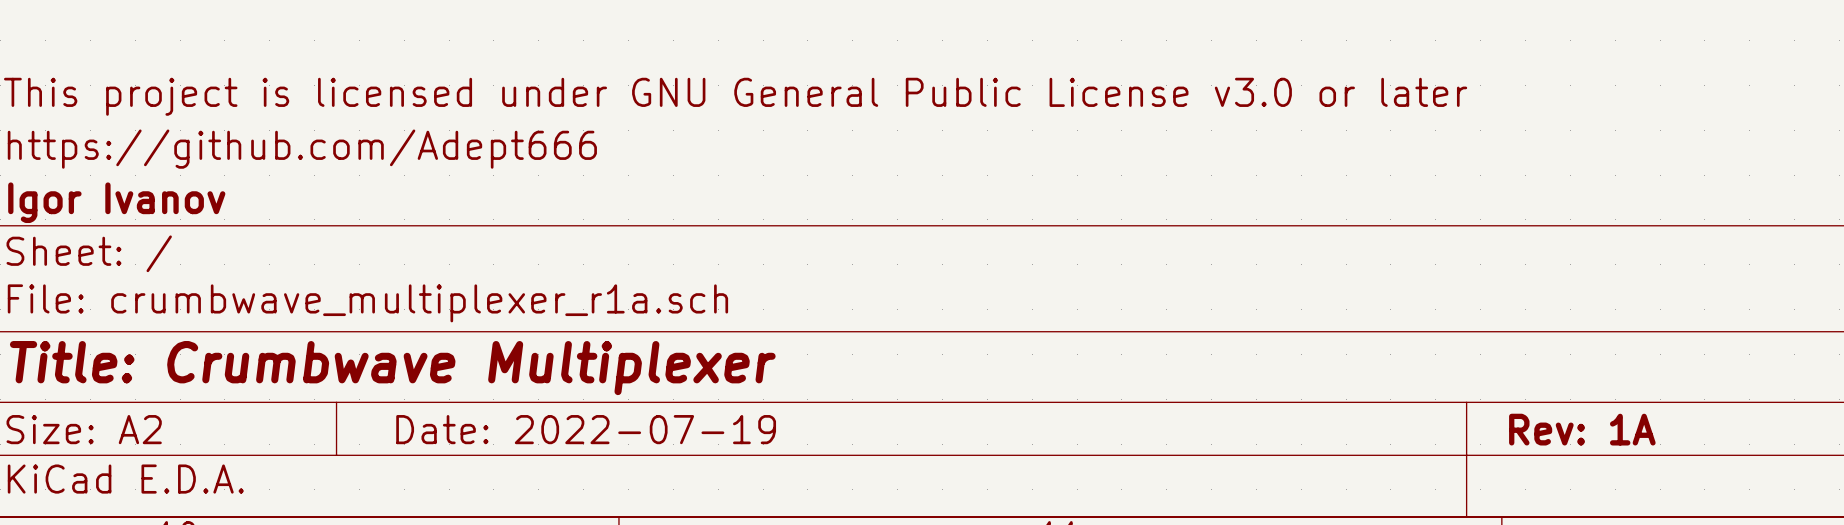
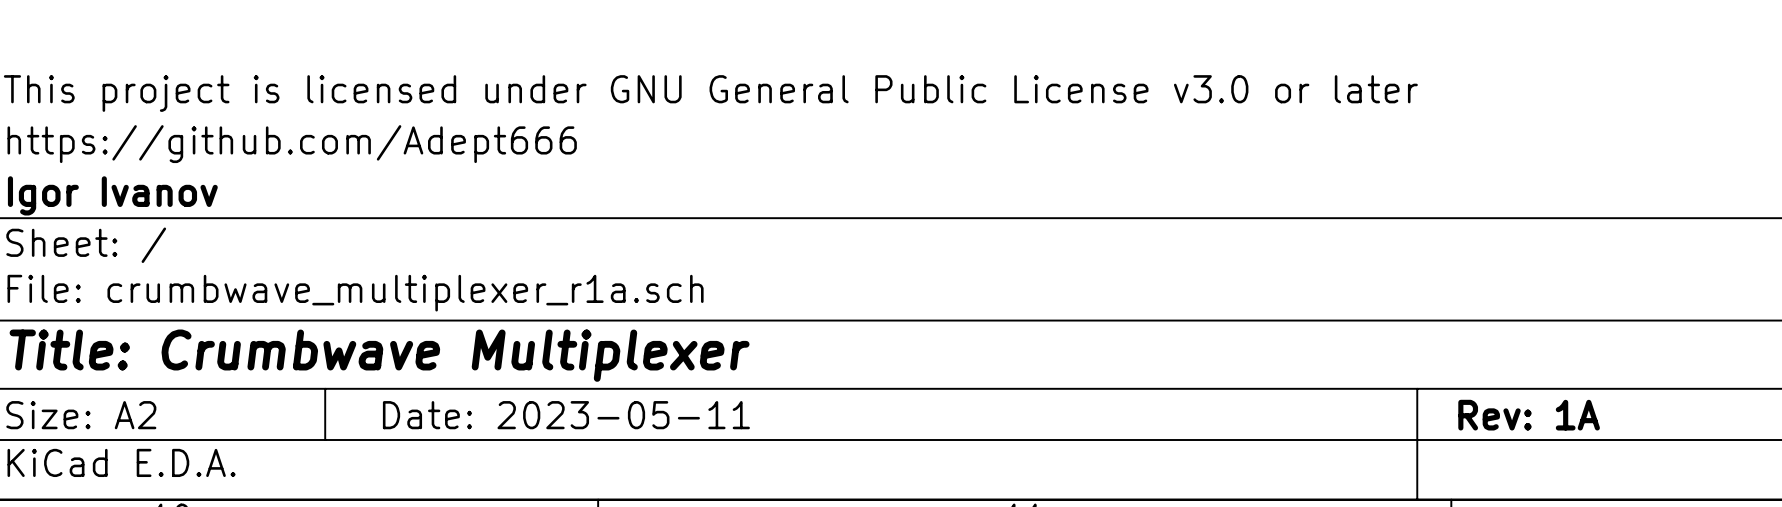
title block: Date: 2022-07-19 (586, 429) -> Date: 2023-05-11 (566, 415)

